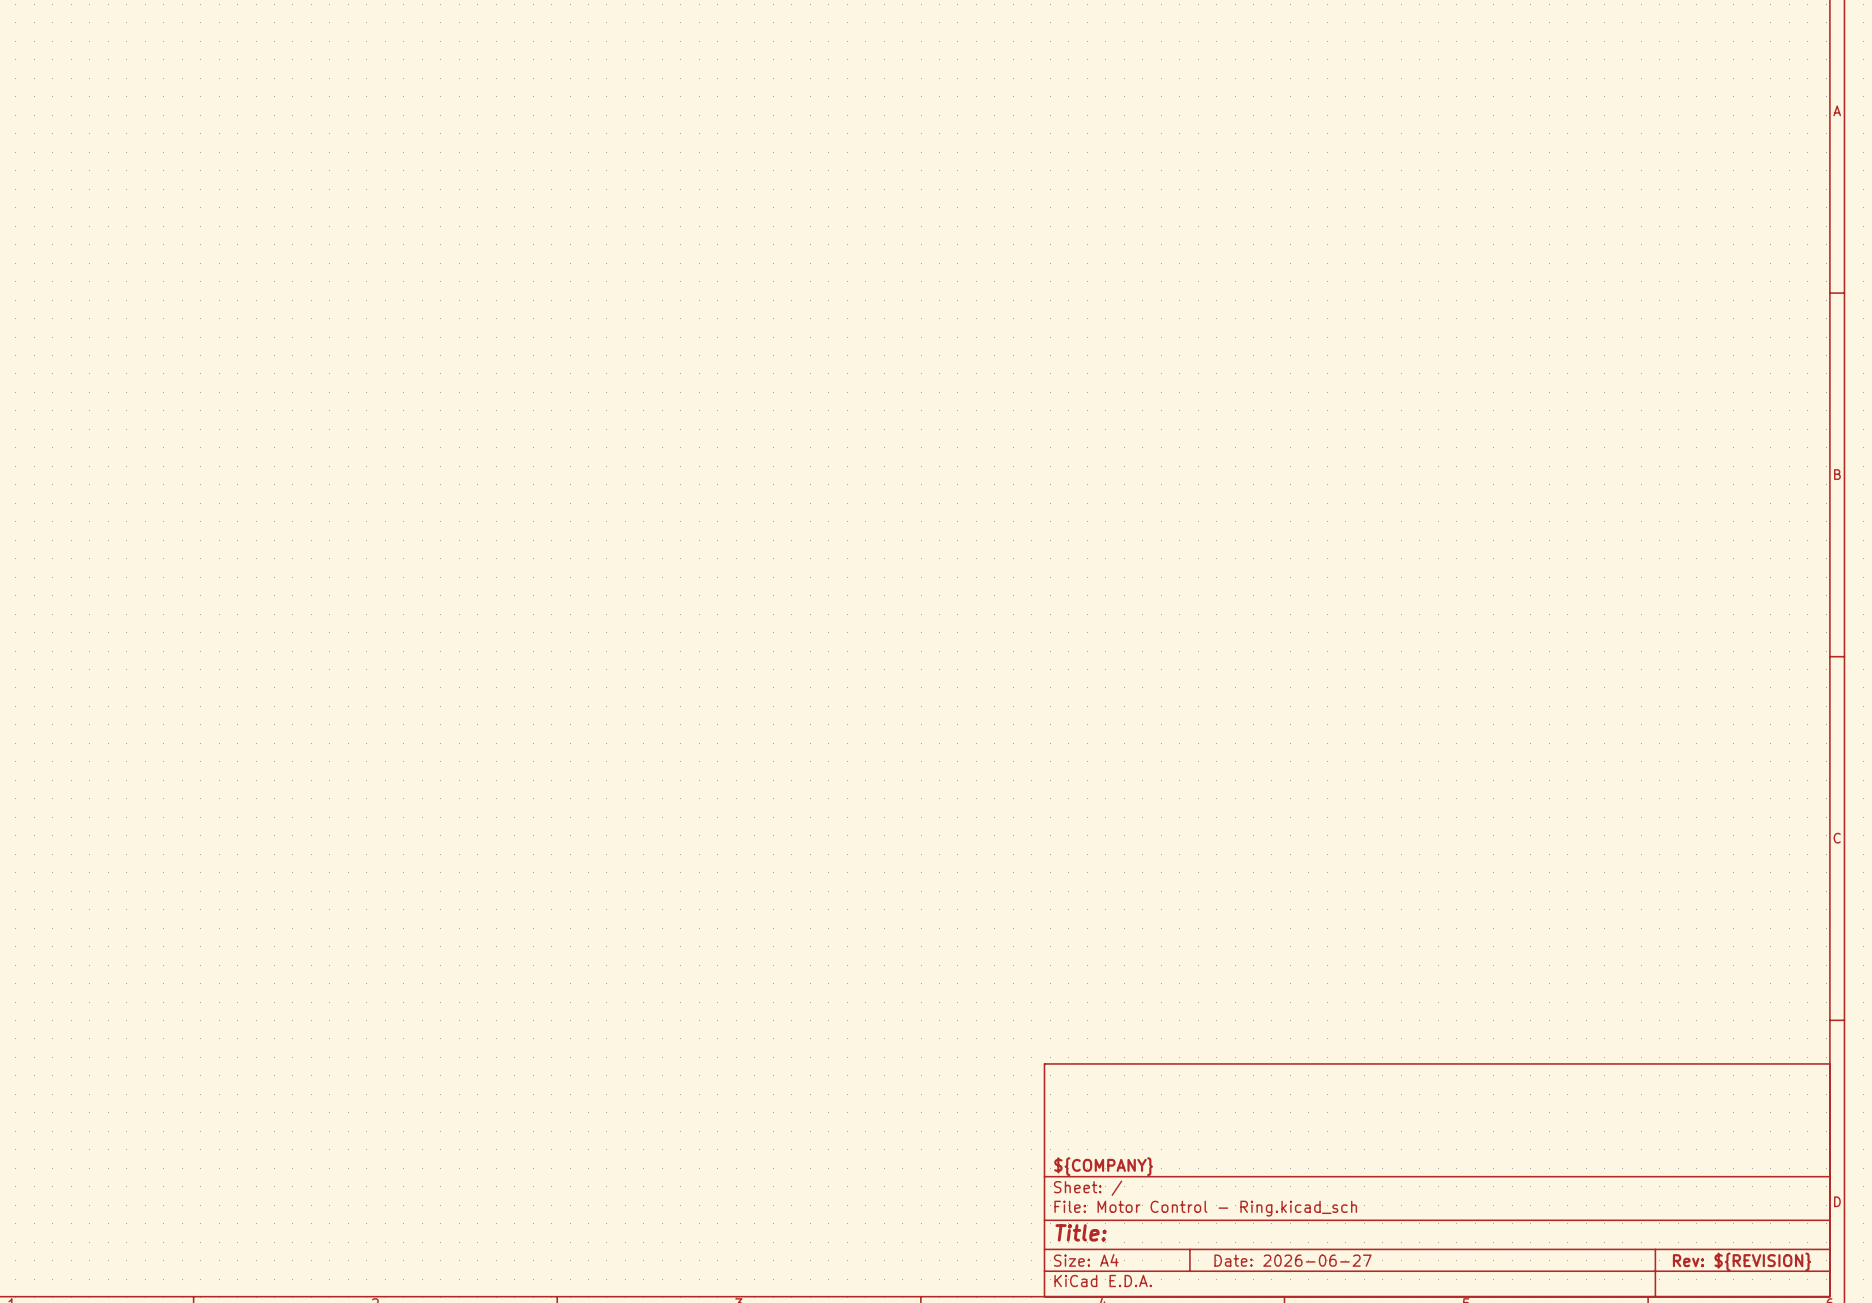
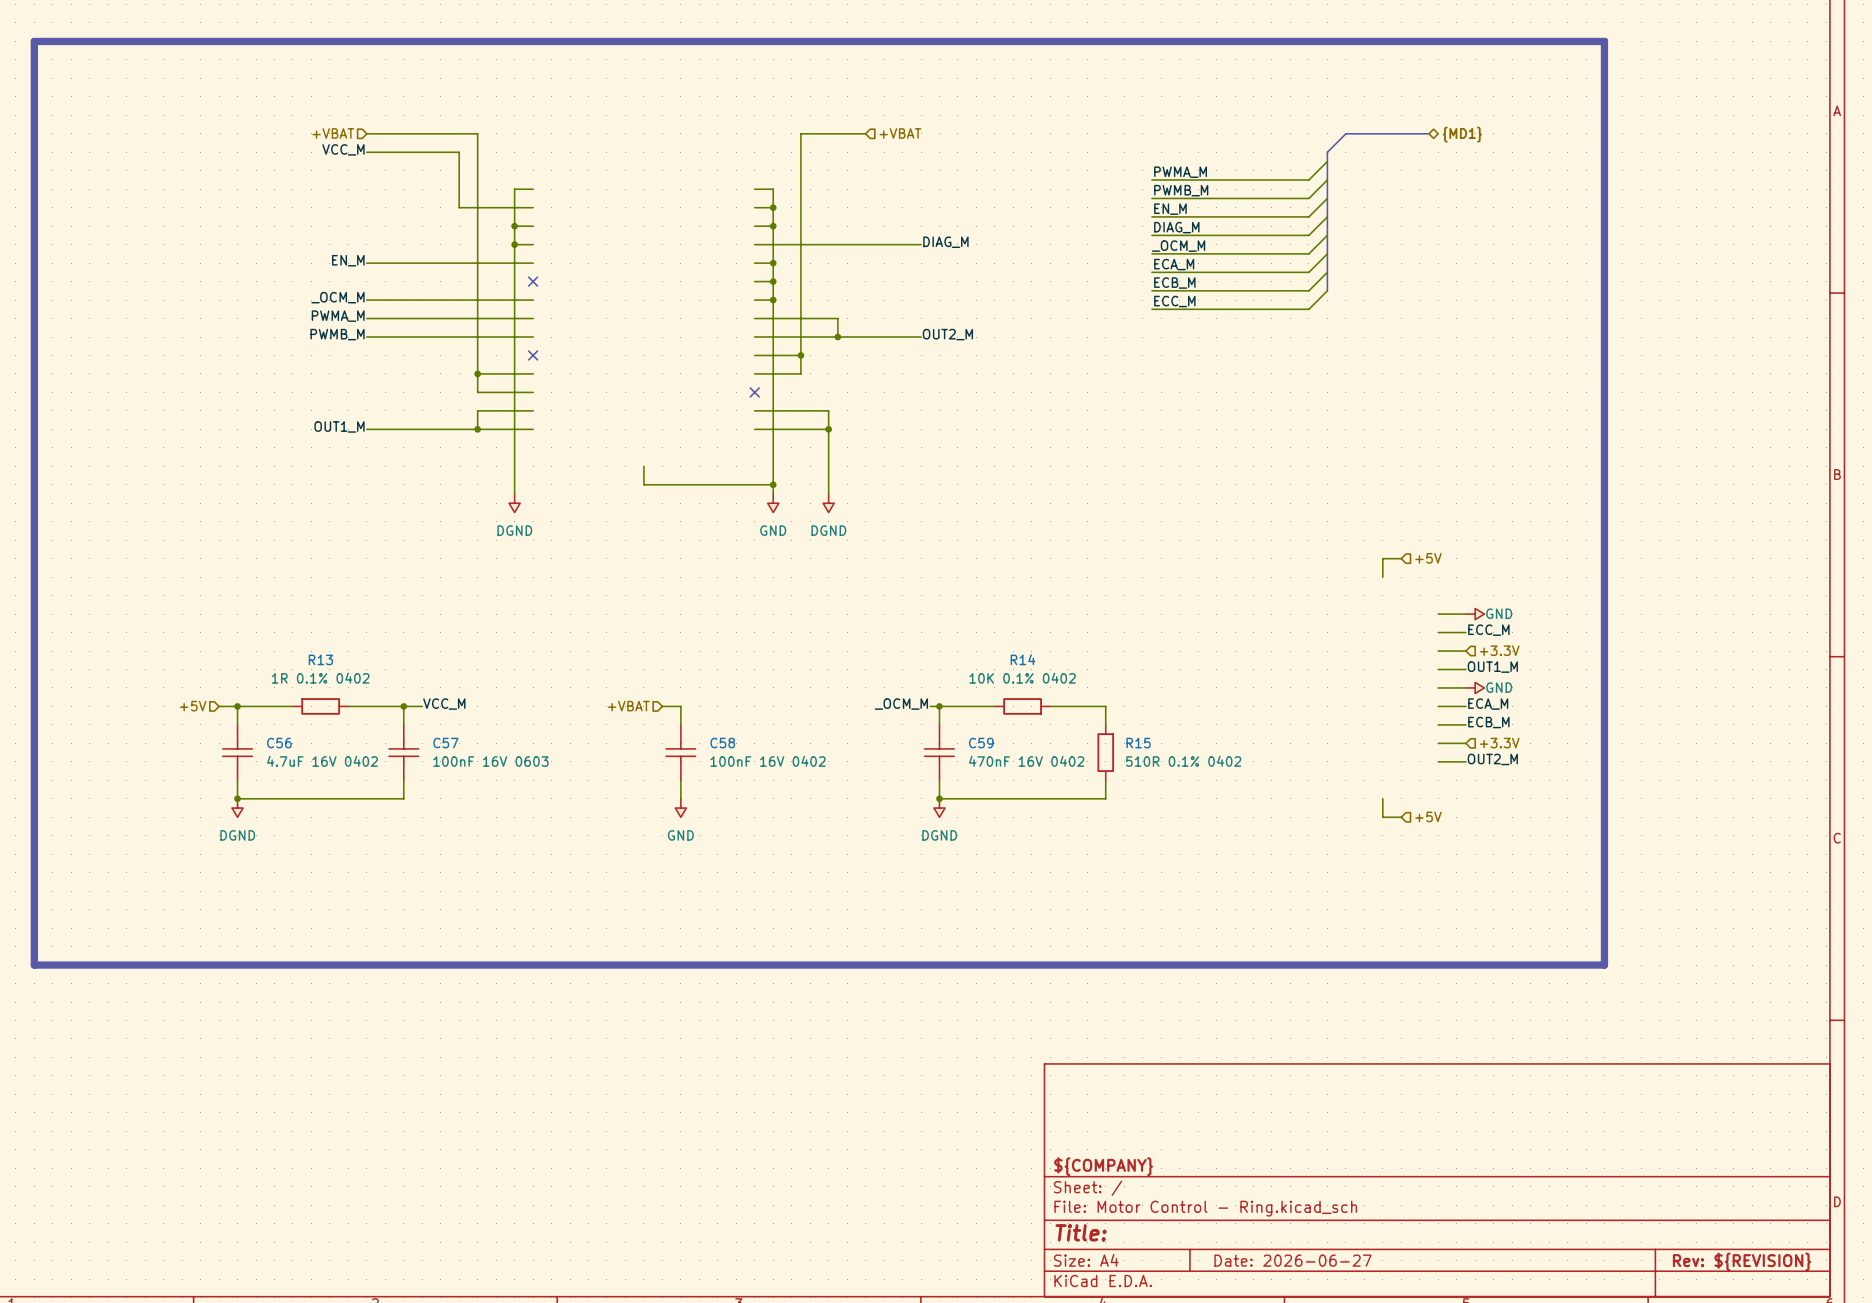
line: none -> (34, 41) (1604, 41) (1604, 965) (34, 965) (34, 41)
hierarchical label: none -> +VBAT (333, 133)
wire: none -> (366, 133) (477, 133) (477, 392) (533, 392)
wire: none -> (865, 133) (800, 133) (800, 373) (754, 373)
hierarchical label: none -> +VBAT (900, 133)
bus: none -> (1428, 133) (1345, 133) (1327, 152) (1327, 290)
hierarchical label: none -> {MD1} (1462, 134)
label: none -> VCC_M (343, 149)
wire: none -> (366, 152) (459, 152) (459, 207) (533, 207)
wire: none -> (1327, 161) (1308, 179) (1151, 179)
label: none -> PWMA_M (1180, 172)
wire: none -> (1327, 179) (1308, 198) (1151, 198)
wire: none -> (533, 189) (514, 189) (514, 494)
wire: none -> (754, 189) (773, 189) (773, 494)
label: none -> PWMB_M (1181, 190)
wire: none -> (1327, 198) (1308, 216) (1151, 216)
wire: none -> (754, 207) (773, 207)
junction: none -> (773, 207)
label: none -> EN_M (1170, 209)
wire: none -> (1327, 216) (1308, 235) (1151, 235)
wire: none -> (514, 226) (533, 226)
junction: none -> (514, 226)
wire: none -> (754, 226) (773, 226)
junction: none -> (773, 226)
label: none -> DIAG_M (1176, 227)
wire: none -> (1327, 235) (1308, 253) (1151, 253)
label: none -> DIAG_M (945, 242)
wire: none -> (514, 244) (533, 244)
junction: none -> (514, 244)
wire: none -> (754, 244) (921, 244)
label: none -> _OCM_M (1178, 246)
wire: none -> (1327, 253) (1308, 272) (1151, 272)
label: none -> EN_M (348, 260)
wire: none -> (366, 263) (533, 263)
wire: none -> (754, 263) (773, 263)
junction: none -> (773, 263)
label: none -> ECA_M (1174, 264)
wire: none -> (1327, 272) (1308, 290) (1151, 290)
no-connect mark: none -> (533, 281)
wire: none -> (754, 281) (773, 281)
junction: none -> (773, 281)
label: none -> ECB_M (1174, 283)
wire: none -> (1327, 290) (1308, 309) (1151, 309)
label: none -> _OCM_M (337, 297)
wire: none -> (366, 300) (533, 300)
wire: none -> (754, 300) (773, 300)
junction: none -> (773, 300)
label: none -> ECC_M (1174, 301)
label: none -> PWMA_M (338, 316)
wire: none -> (366, 318) (533, 318)
wire: none -> (754, 318) (837, 318) (837, 337)
label: none -> PWMB_M (337, 334)
label: none -> OUT2_M (947, 334)
wire: none -> (366, 337) (533, 337)
wire: none -> (754, 337) (921, 337)
junction: none -> (837, 337)
no-connect mark: none -> (533, 355)
wire: none -> (754, 355) (800, 355)
junction: none -> (800, 355)
wire: none -> (477, 373) (533, 373)
junction: none -> (477, 373)
no-connect mark: none -> (754, 392)
wire: none -> (533, 410) (477, 410) (477, 429)
wire: none -> (754, 410) (828, 410) (828, 494)
label: none -> OUT1_M (339, 426)
wire: none -> (366, 429) (533, 429)
junction: none -> (477, 429)
wire: none -> (754, 429) (828, 429)
junction: none -> (828, 429)
wire: none -> (643, 466) (643, 484) (773, 484)
junction: none -> (773, 484)
power symbol: none -> DGND (514, 503)
power symbol: none -> GND (773, 503)
power symbol: none -> DGND (828, 503)
wire: none -> (1401, 558) (1382, 558) (1382, 577)
hierarchical label: none -> +5V (1428, 558)
wire: none -> (1438, 614) (1465, 614)
power symbol: none -> GND (1475, 614)
label: none -> ECC_M (1488, 630)
wire: none -> (1438, 632) (1465, 632)
hierarchical label: none -> +3.3V (1499, 650)
wire: none -> (1438, 651) (1465, 651)
label: none -> OUT1_M (1492, 667)
wire: none -> (1438, 669) (1465, 669)
wire: none -> (1438, 687) (1465, 687)
power symbol: none -> GND (1475, 687)
label: none -> VCC_M (444, 704)
label: none -> _OCM_M (901, 704)
label: none -> ECA_M (1488, 704)
hierarchical label: none -> +5V (193, 706)
wire: none -> (219, 706) (292, 706)
wire: none -> (237, 706) (237, 724)
junction: none -> (237, 706)
R13: none -> 1R 0.1% 0402 (320, 706)
wire: none -> (348, 706) (422, 706)
wire: none -> (403, 706) (403, 724)
junction: none -> (403, 706)
hierarchical label: none -> +VBAT (628, 706)
wire: none -> (662, 706) (680, 706) (680, 724)
wire: none -> (930, 706) (994, 706)
wire: none -> (939, 706) (939, 724)
junction: none -> (939, 706)
R14: none -> 10K 0.1% 0402 (1022, 706)
wire: none -> (1050, 706) (1105, 706) (1105, 724)
wire: none -> (1438, 706) (1465, 706)
label: none -> ECB_M (1488, 722)
wire: none -> (1438, 724) (1465, 724)
wire: none -> (1438, 743) (1465, 743)
hierarchical label: none -> +3.3V (1499, 743)
C56: none -> 4.7uF 16V 0402 (237, 752)
C57: none -> 100nF 16V 0603 (403, 752)
C58: none -> 100nF 16V 0402 (680, 752)
C59: none -> 470nF 16V 0402 (939, 752)
R15: none -> 510R 0.1% 0402 (1105, 752)
label: none -> OUT2_M (1492, 759)
wire: none -> (1438, 761) (1465, 761)
wire: none -> (237, 780) (237, 798) (403, 798) (403, 780)
wire: none -> (680, 780) (680, 798)
wire: none -> (939, 780) (939, 798) (1105, 798) (1105, 780)
junction: none -> (237, 798)
junction: none -> (939, 798)
wire: none -> (1382, 798) (1382, 817) (1401, 817)
power symbol: none -> DGND (237, 808)
power symbol: none -> GND (680, 808)
power symbol: none -> DGND (939, 808)
hierarchical label: none -> +5V (1428, 816)

